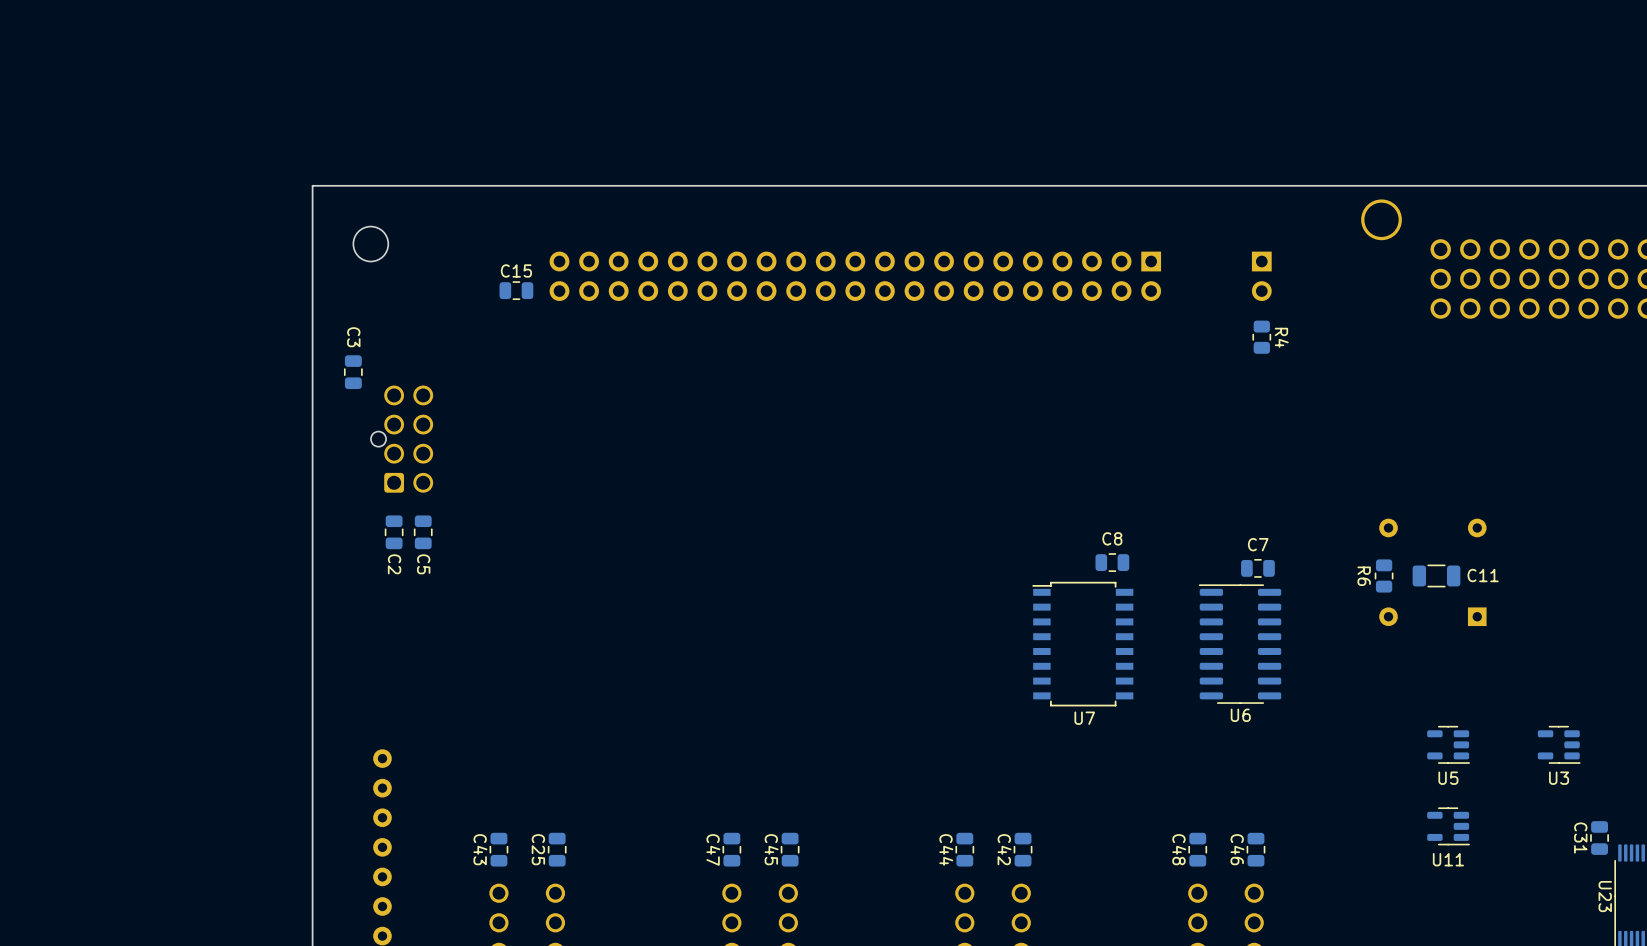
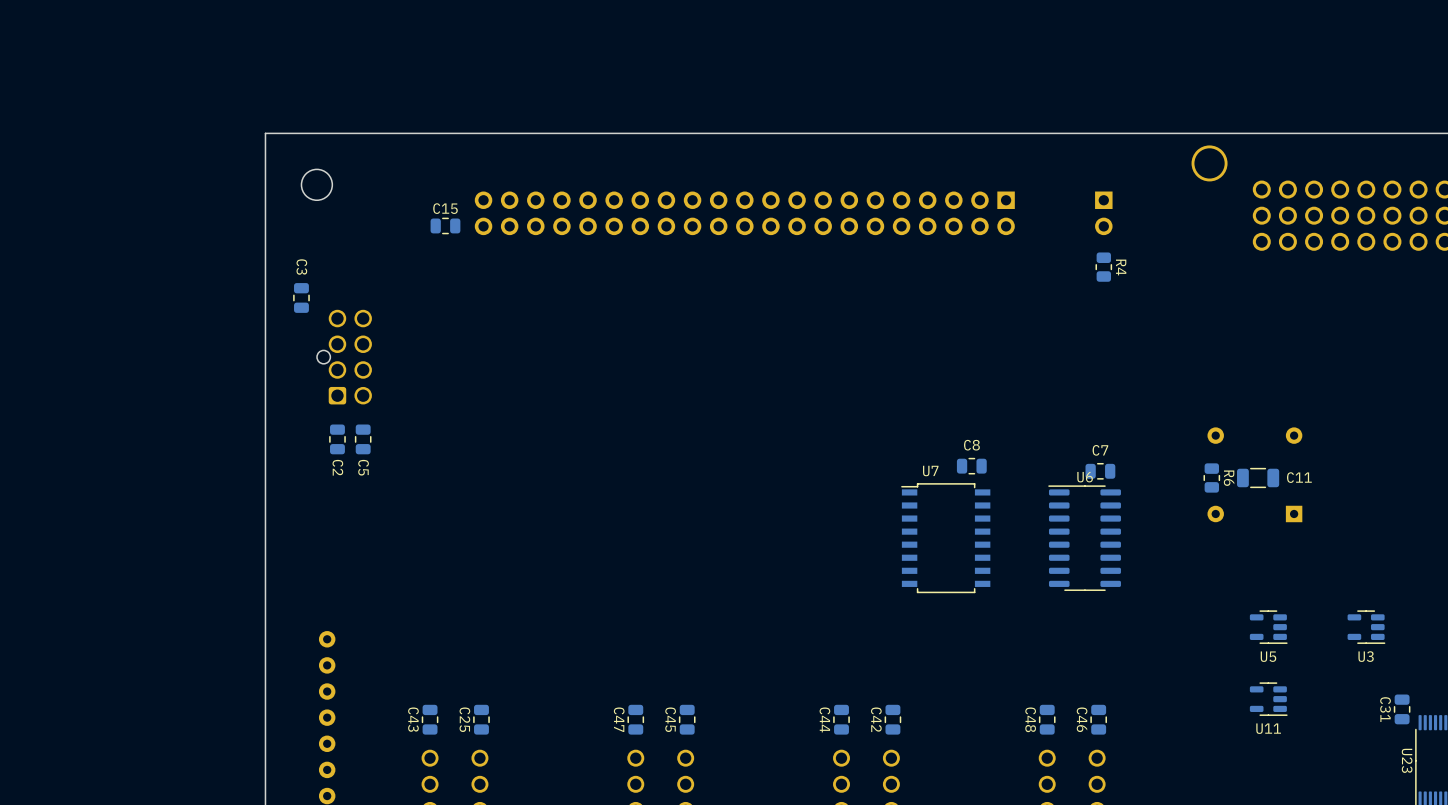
R6 name position: R6 (1364, 576) -> R6 (1229, 478)
U6 name position: U6 (1240, 715) -> U6 (1085, 477)
U7 name position: U7 (1084, 718) -> U7 (930, 471)

